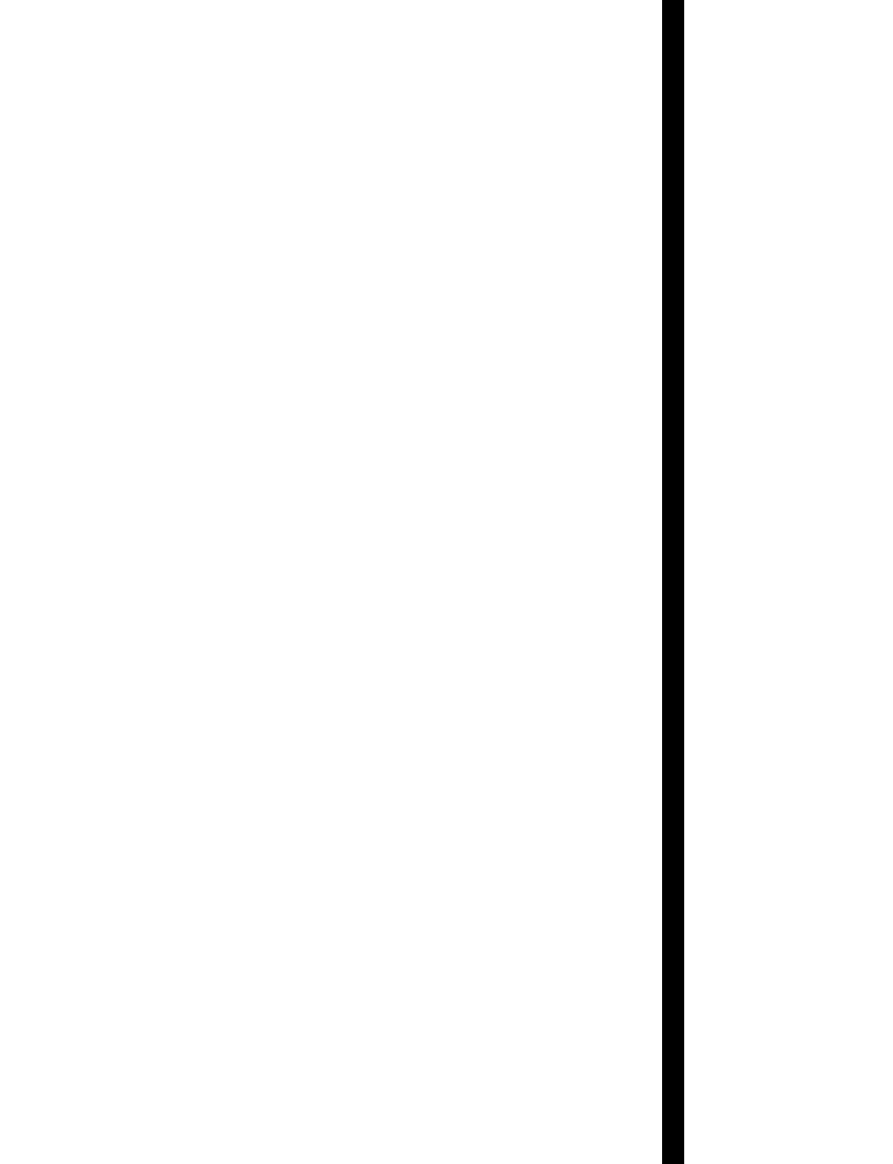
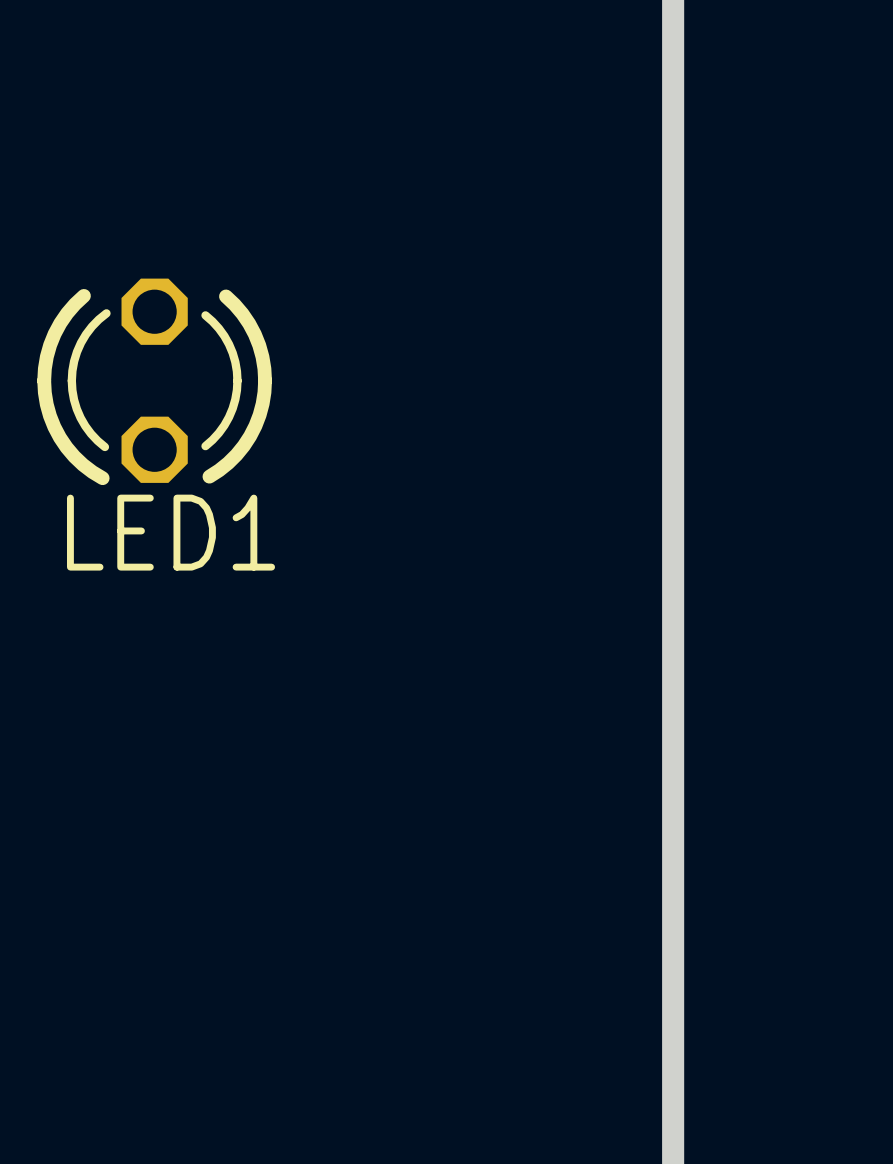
LED1: none -> (154, 381)

